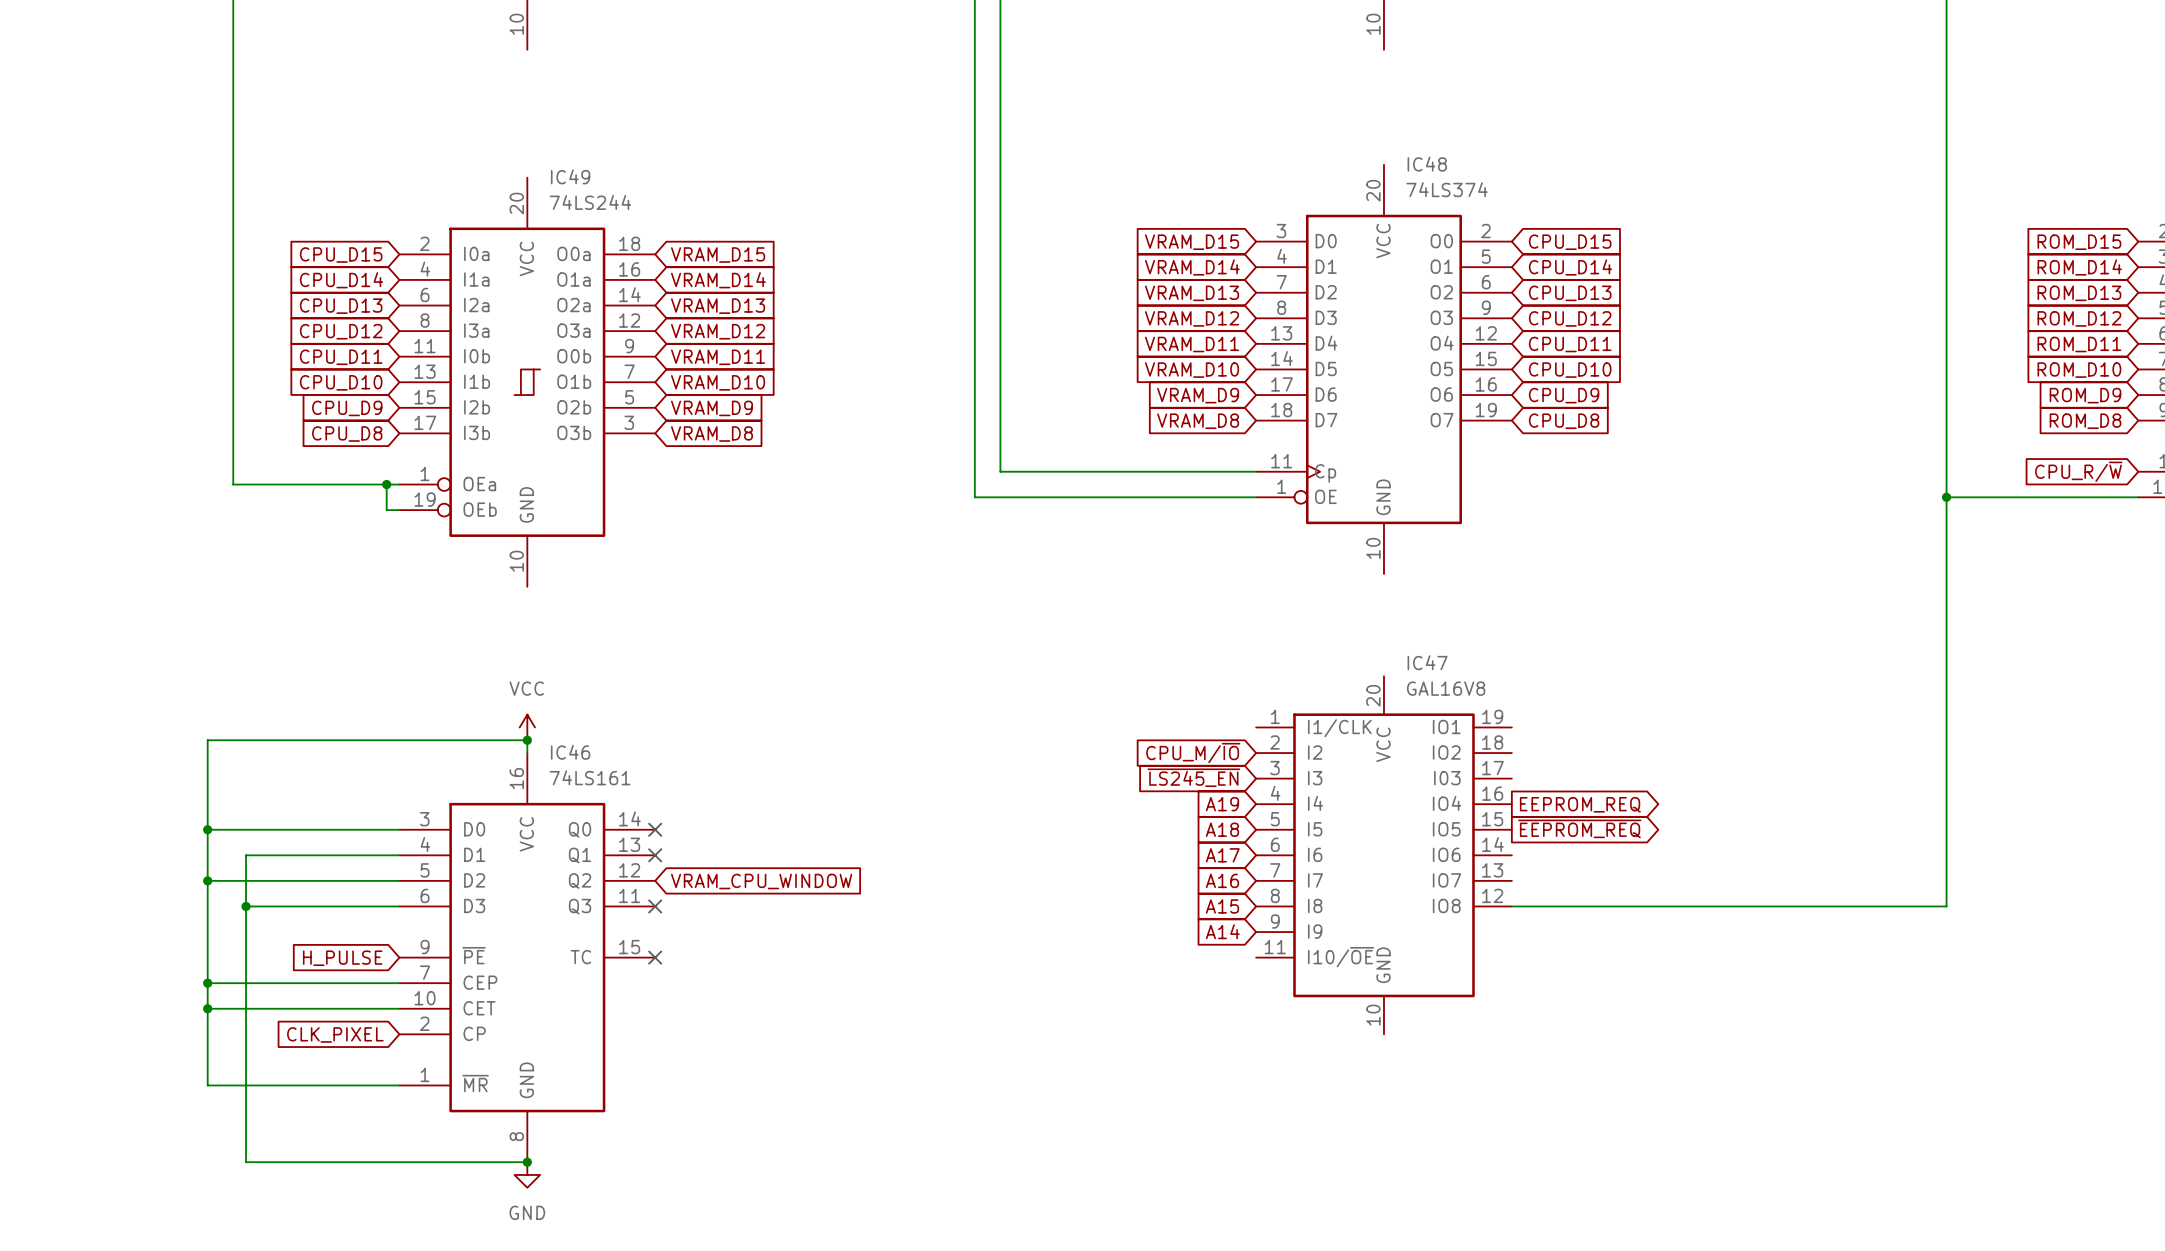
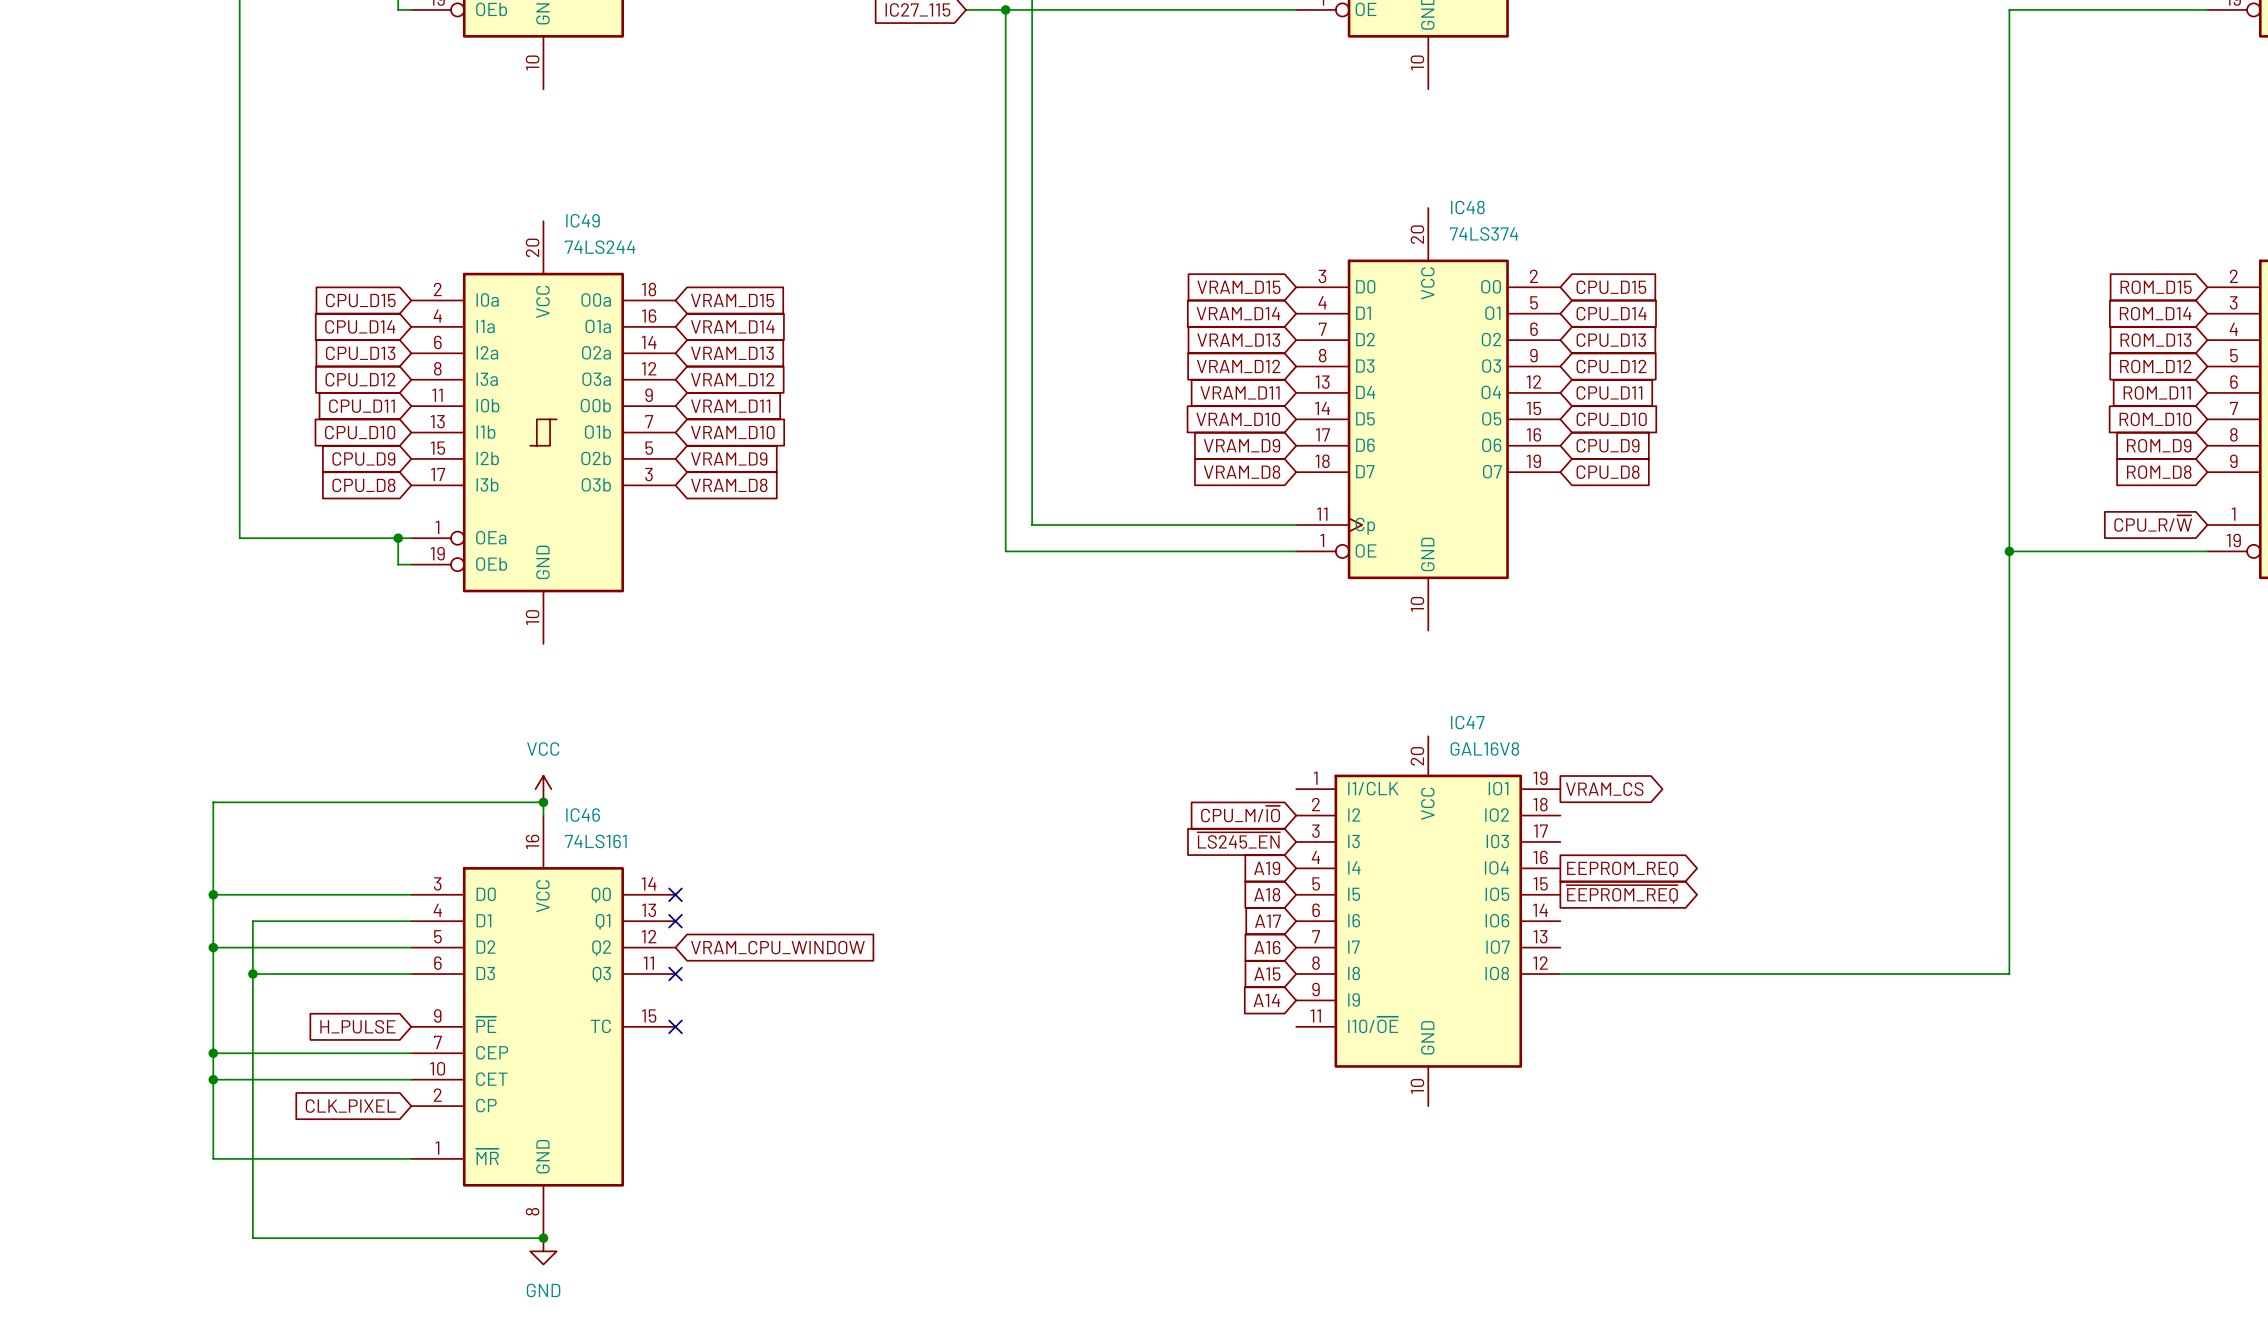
global label: none -> VRAM_CS (1604, 789)

